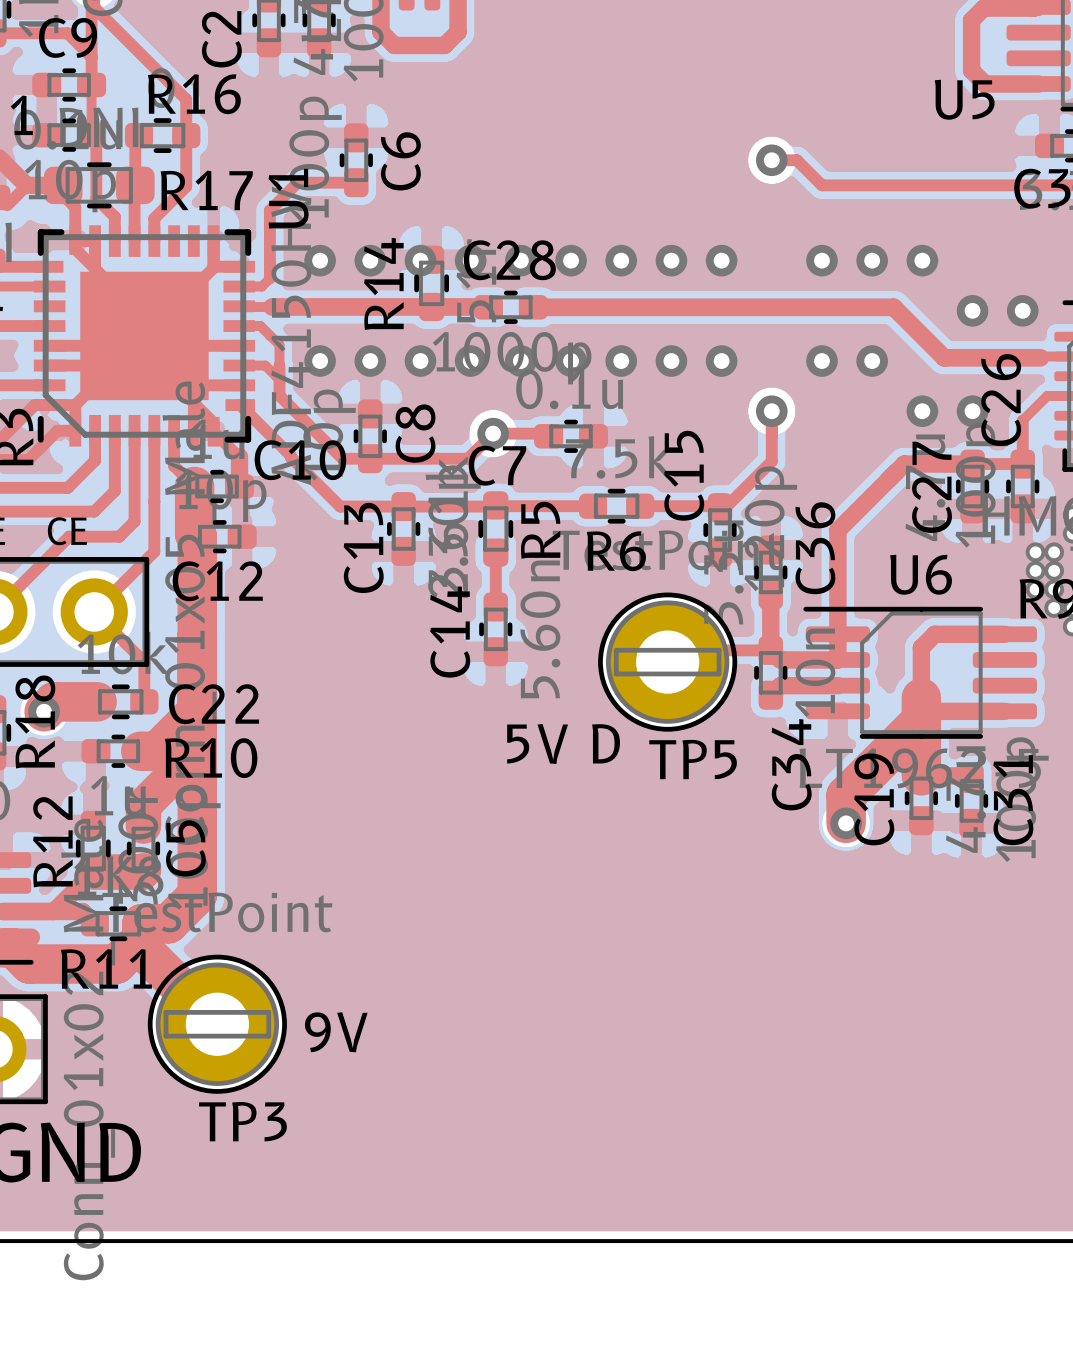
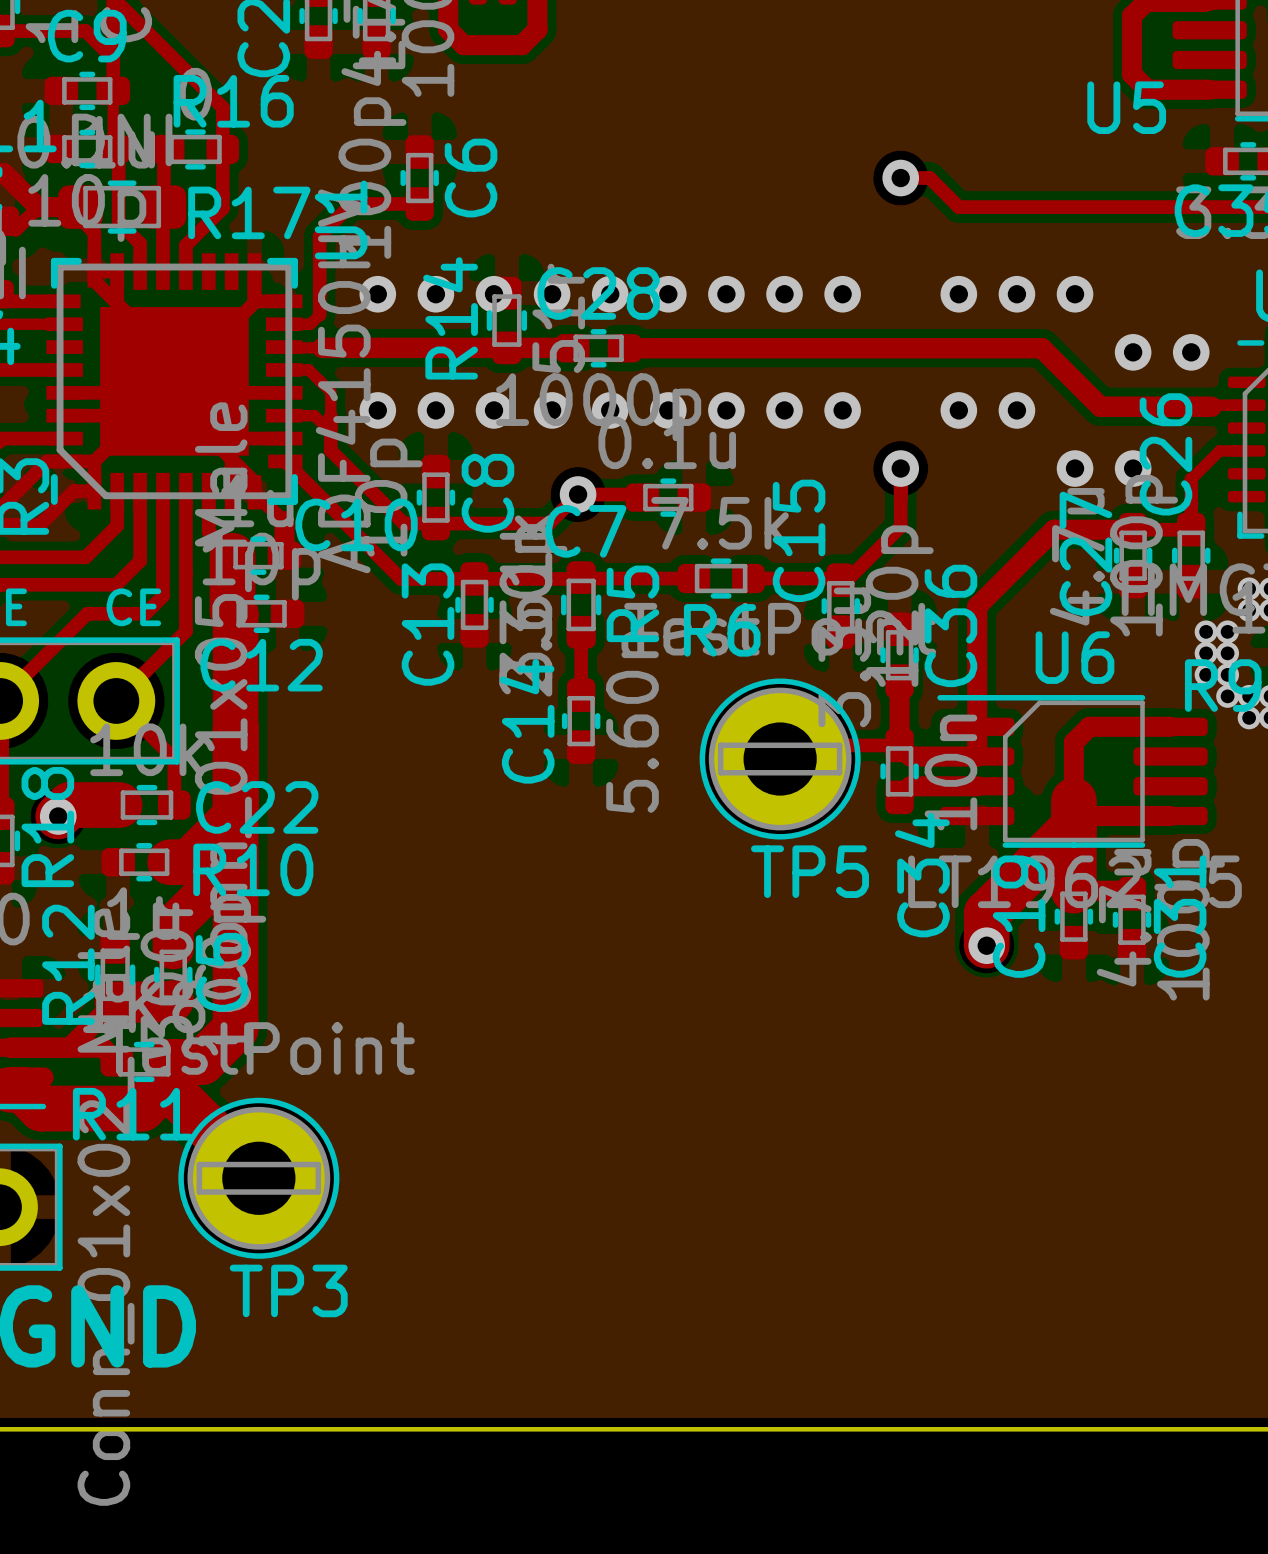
text: 5V D (563, 744) -> none
text: 9V (336, 1032) -> none

